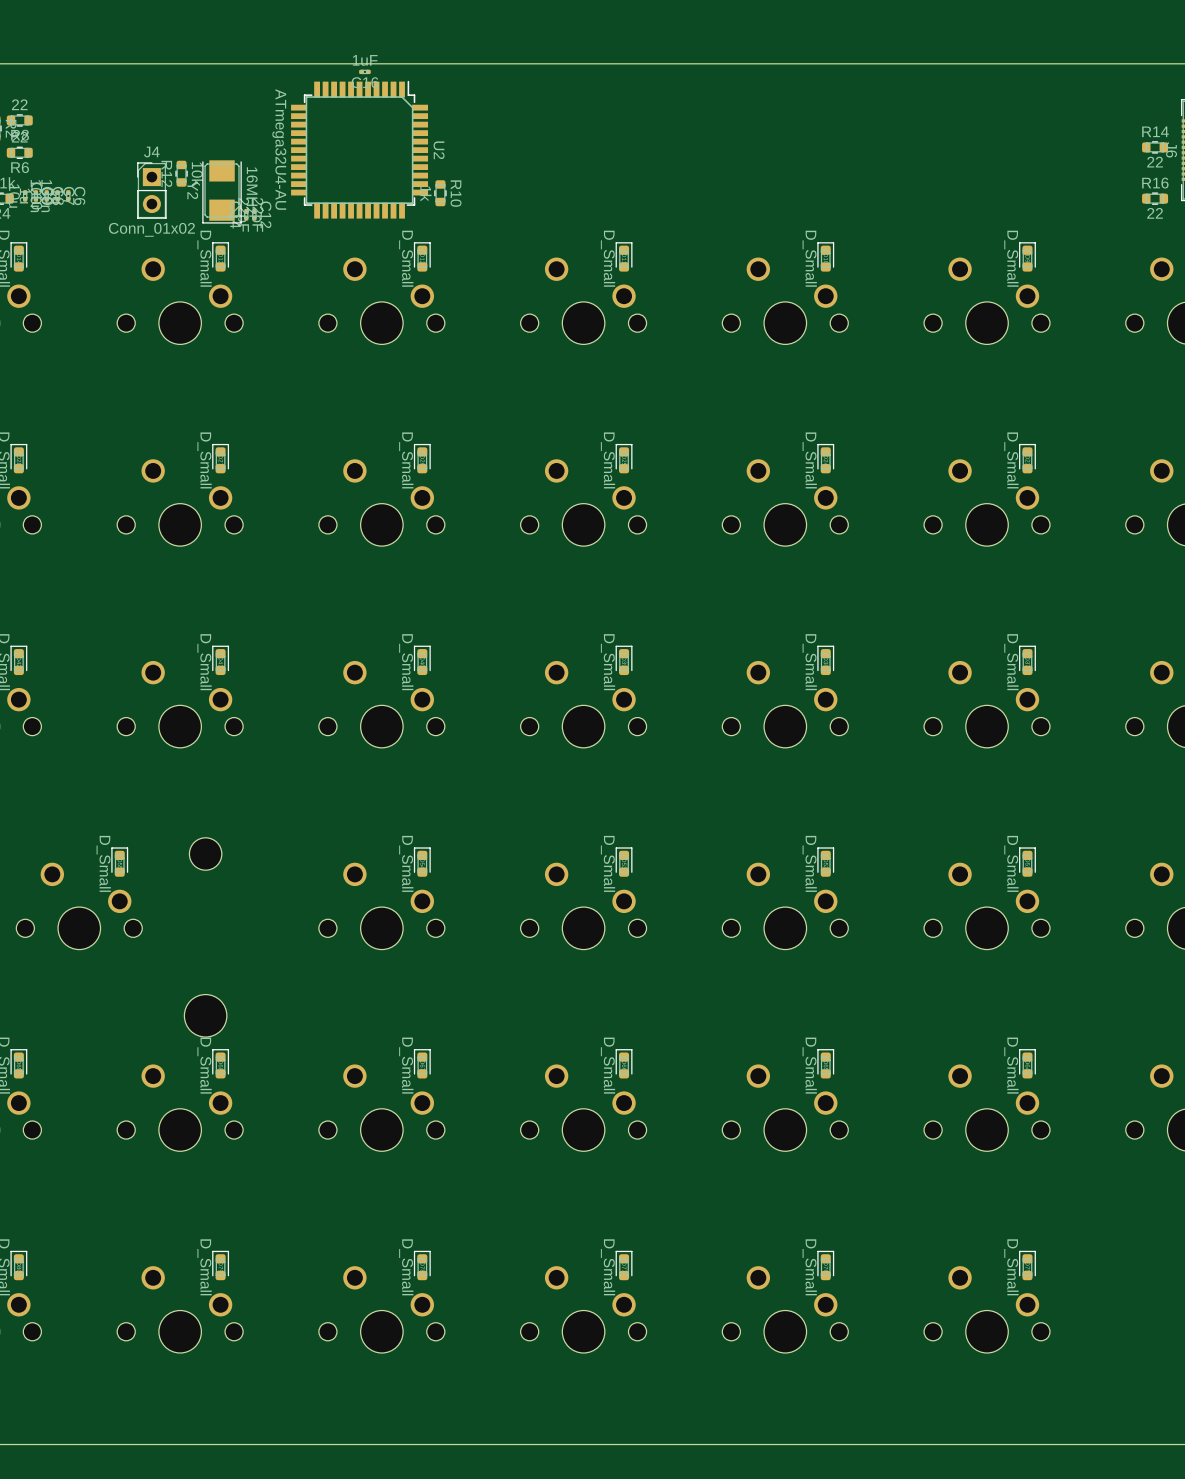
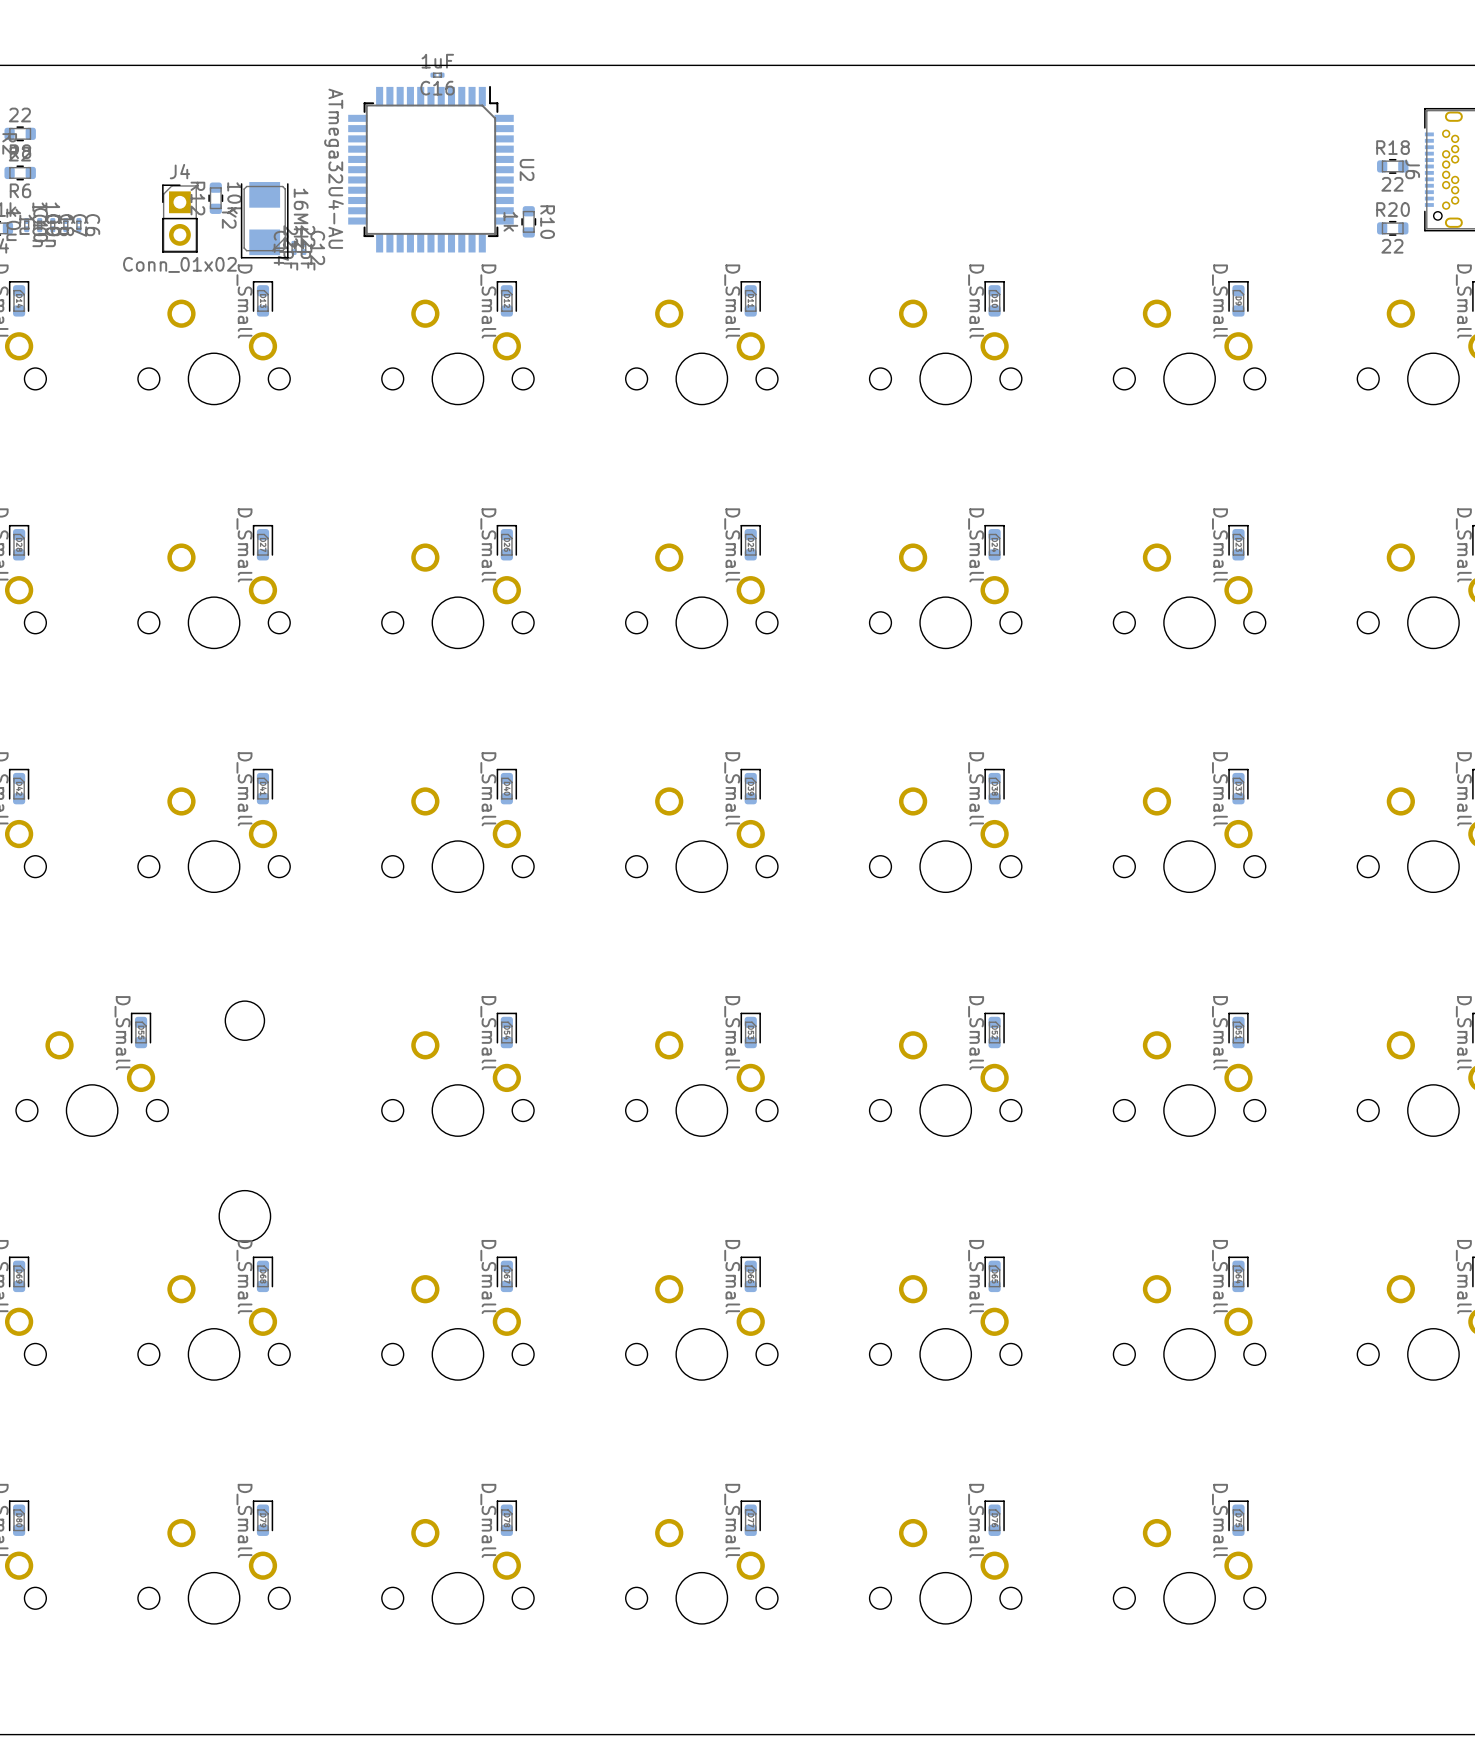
R14 name: R14 (1155, 131) -> R18 (1393, 147)
R16 name: R16 (1155, 183) -> R20 (1393, 209)

